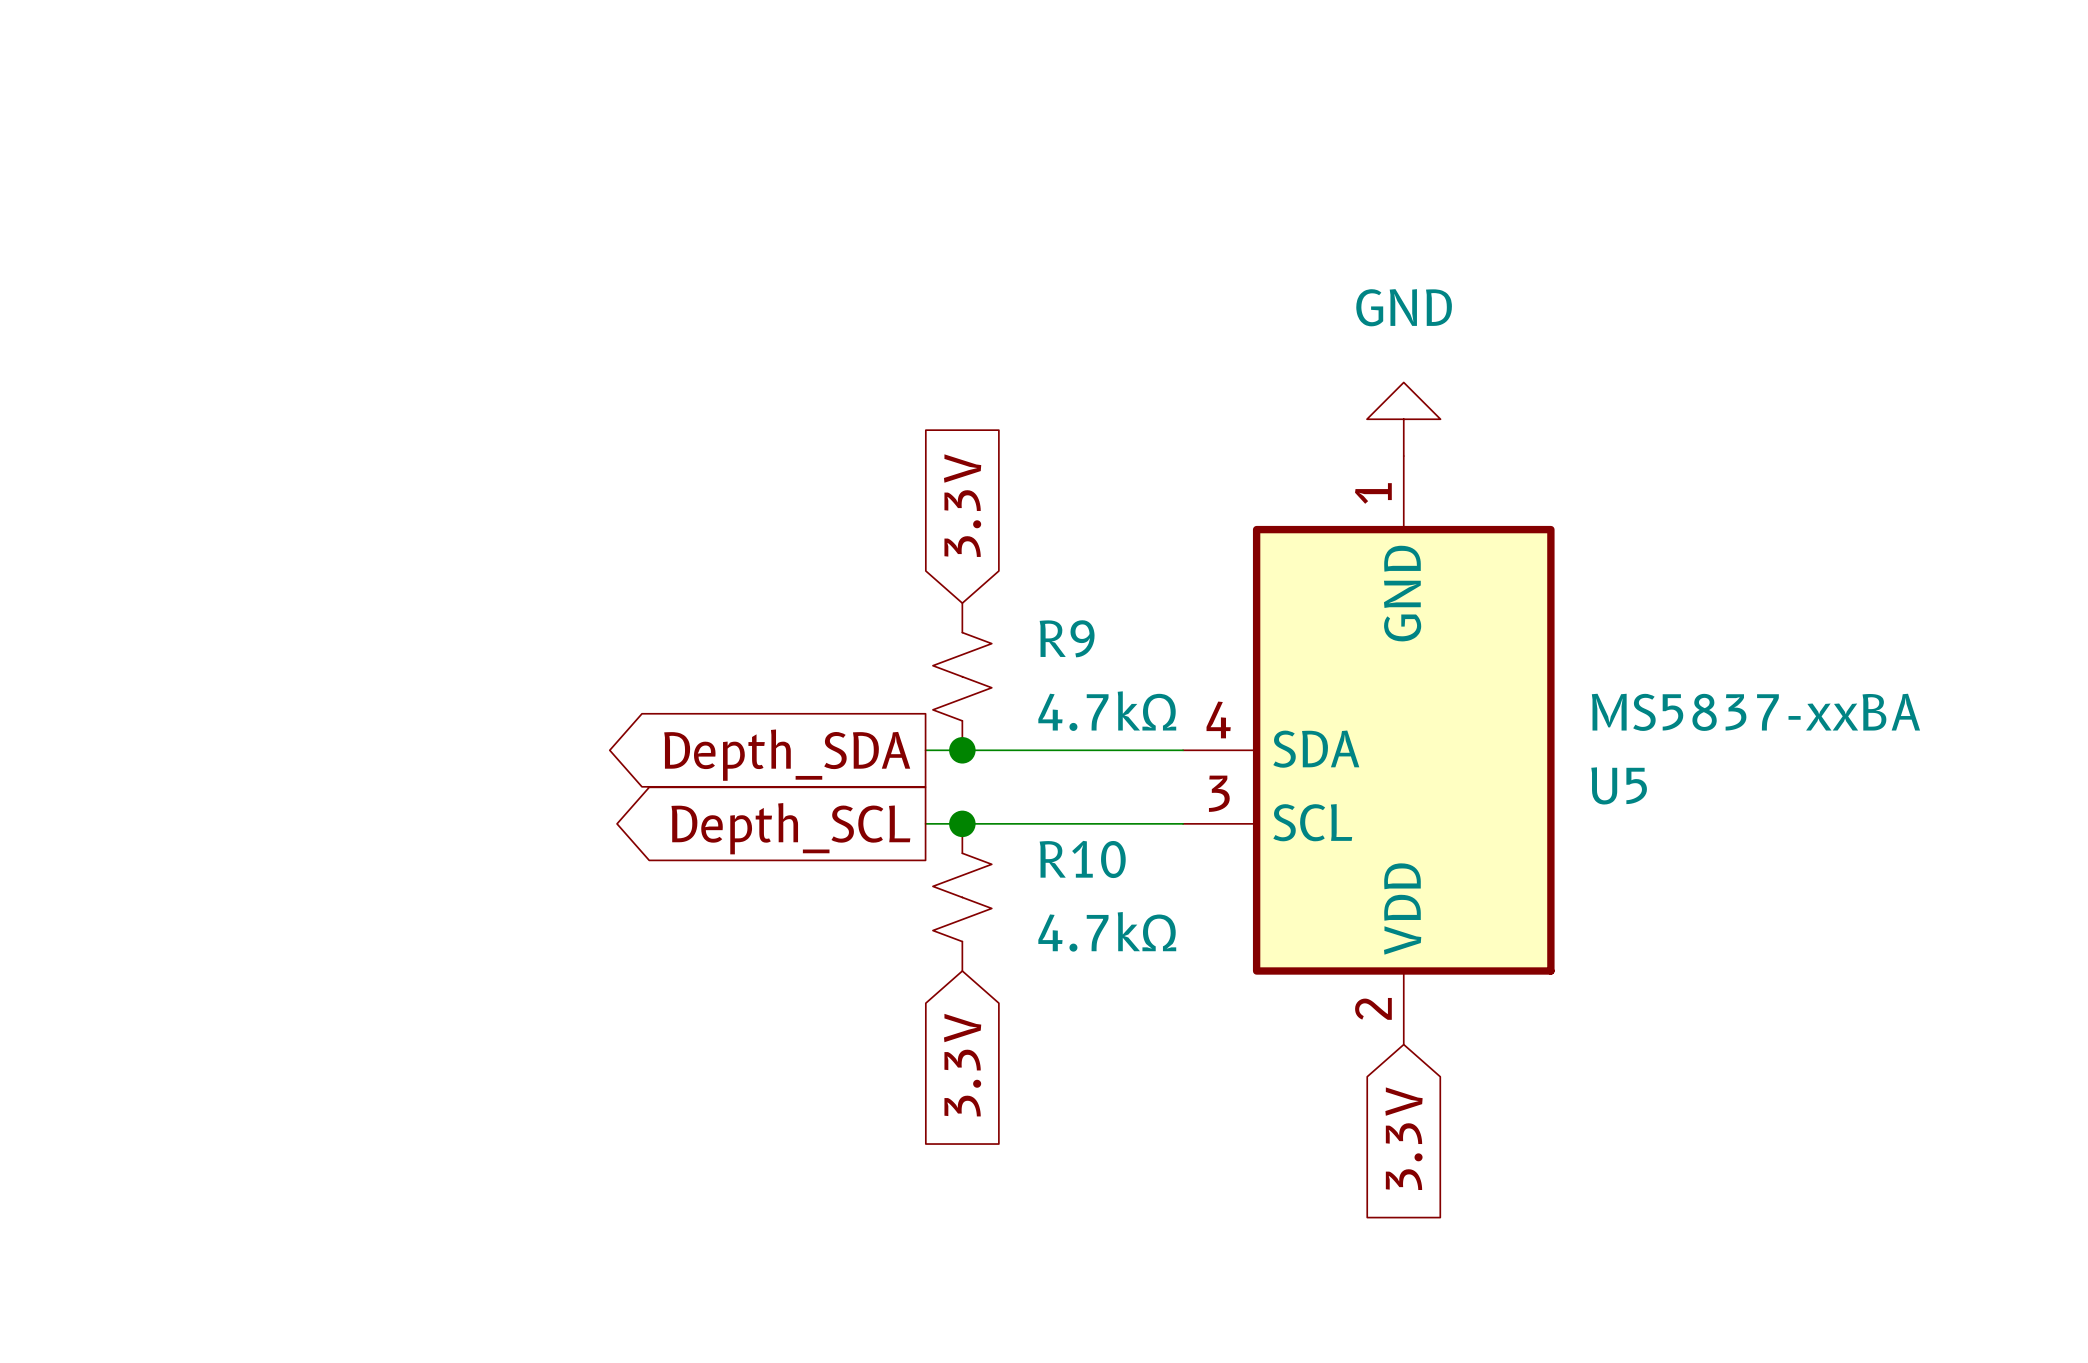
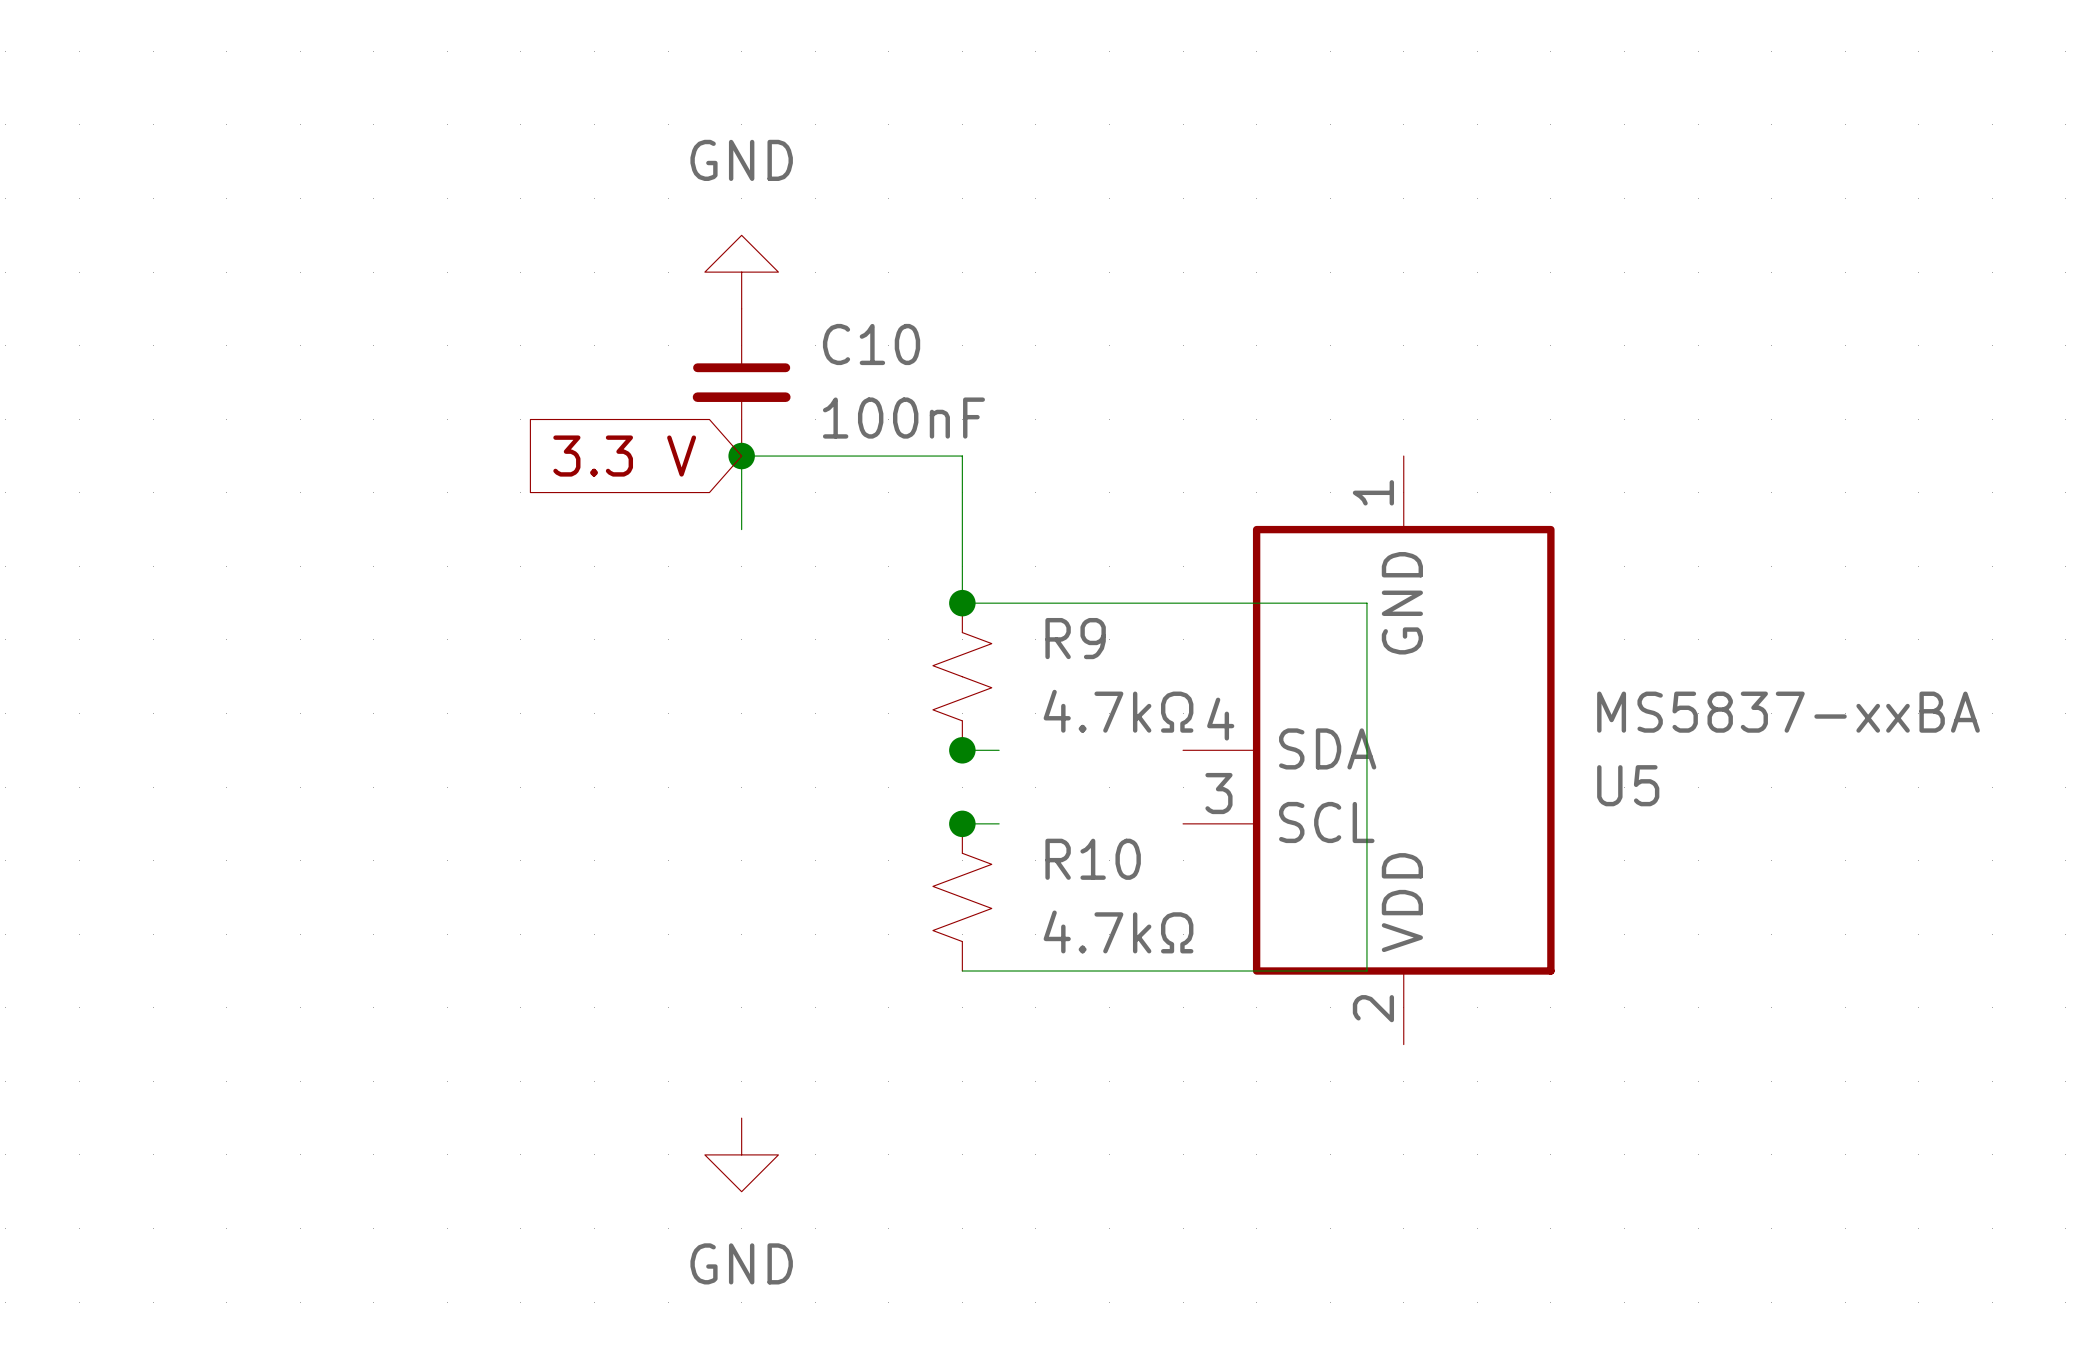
power symbol: none -> GND (741, 272)
C10: none -> 100nF (741, 382)
power symbol: GND (1403, 419) -> none
global label: none -> 3.3 V (624, 456)
junction: none -> (741, 456)
global label: 3.3V (962, 505) -> none
wire: none -> (741, 529) (741, 456) (962, 456) (962, 603) (1366, 603) (1366, 971) (962, 971)
junction: none -> (962, 603)
wire: (925, 750) (962, 750) -> none
wire: (999, 750) (1183, 750) -> none
global label: Depth_SDA (787, 755) -> none
wire: (925, 823) (962, 823) -> none
wire: (999, 823) (1183, 823) -> none
global label: Depth_SCL (790, 828) -> none
global label: 3.3V (962, 1065) -> none
global label: 3.3V (1404, 1138) -> none
power symbol: none -> GND (741, 1154)

